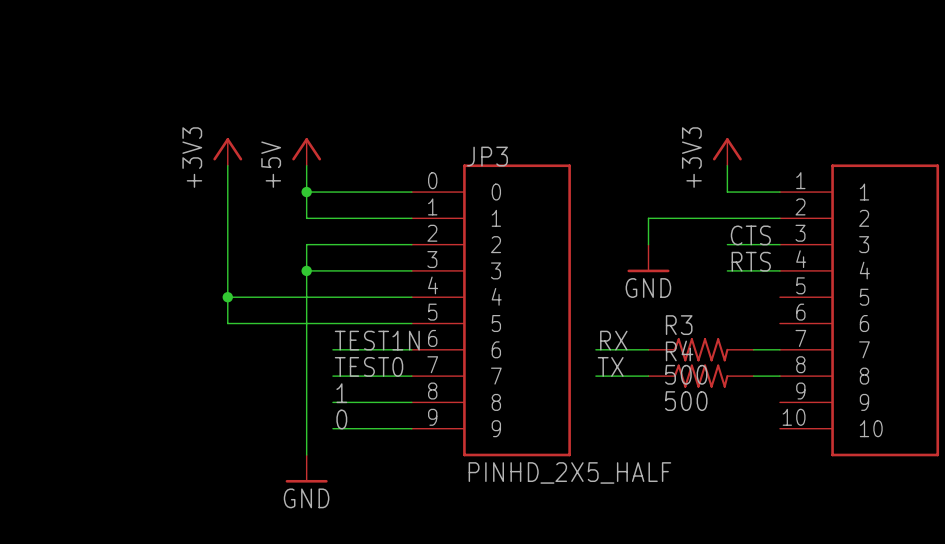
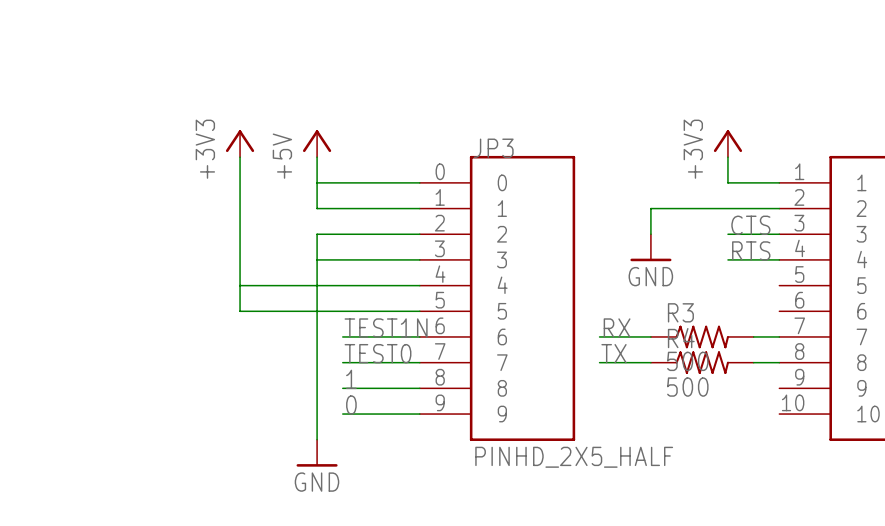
junction: (306, 192) -> none
junction: (306, 270) -> none
junction: (227, 297) -> none

